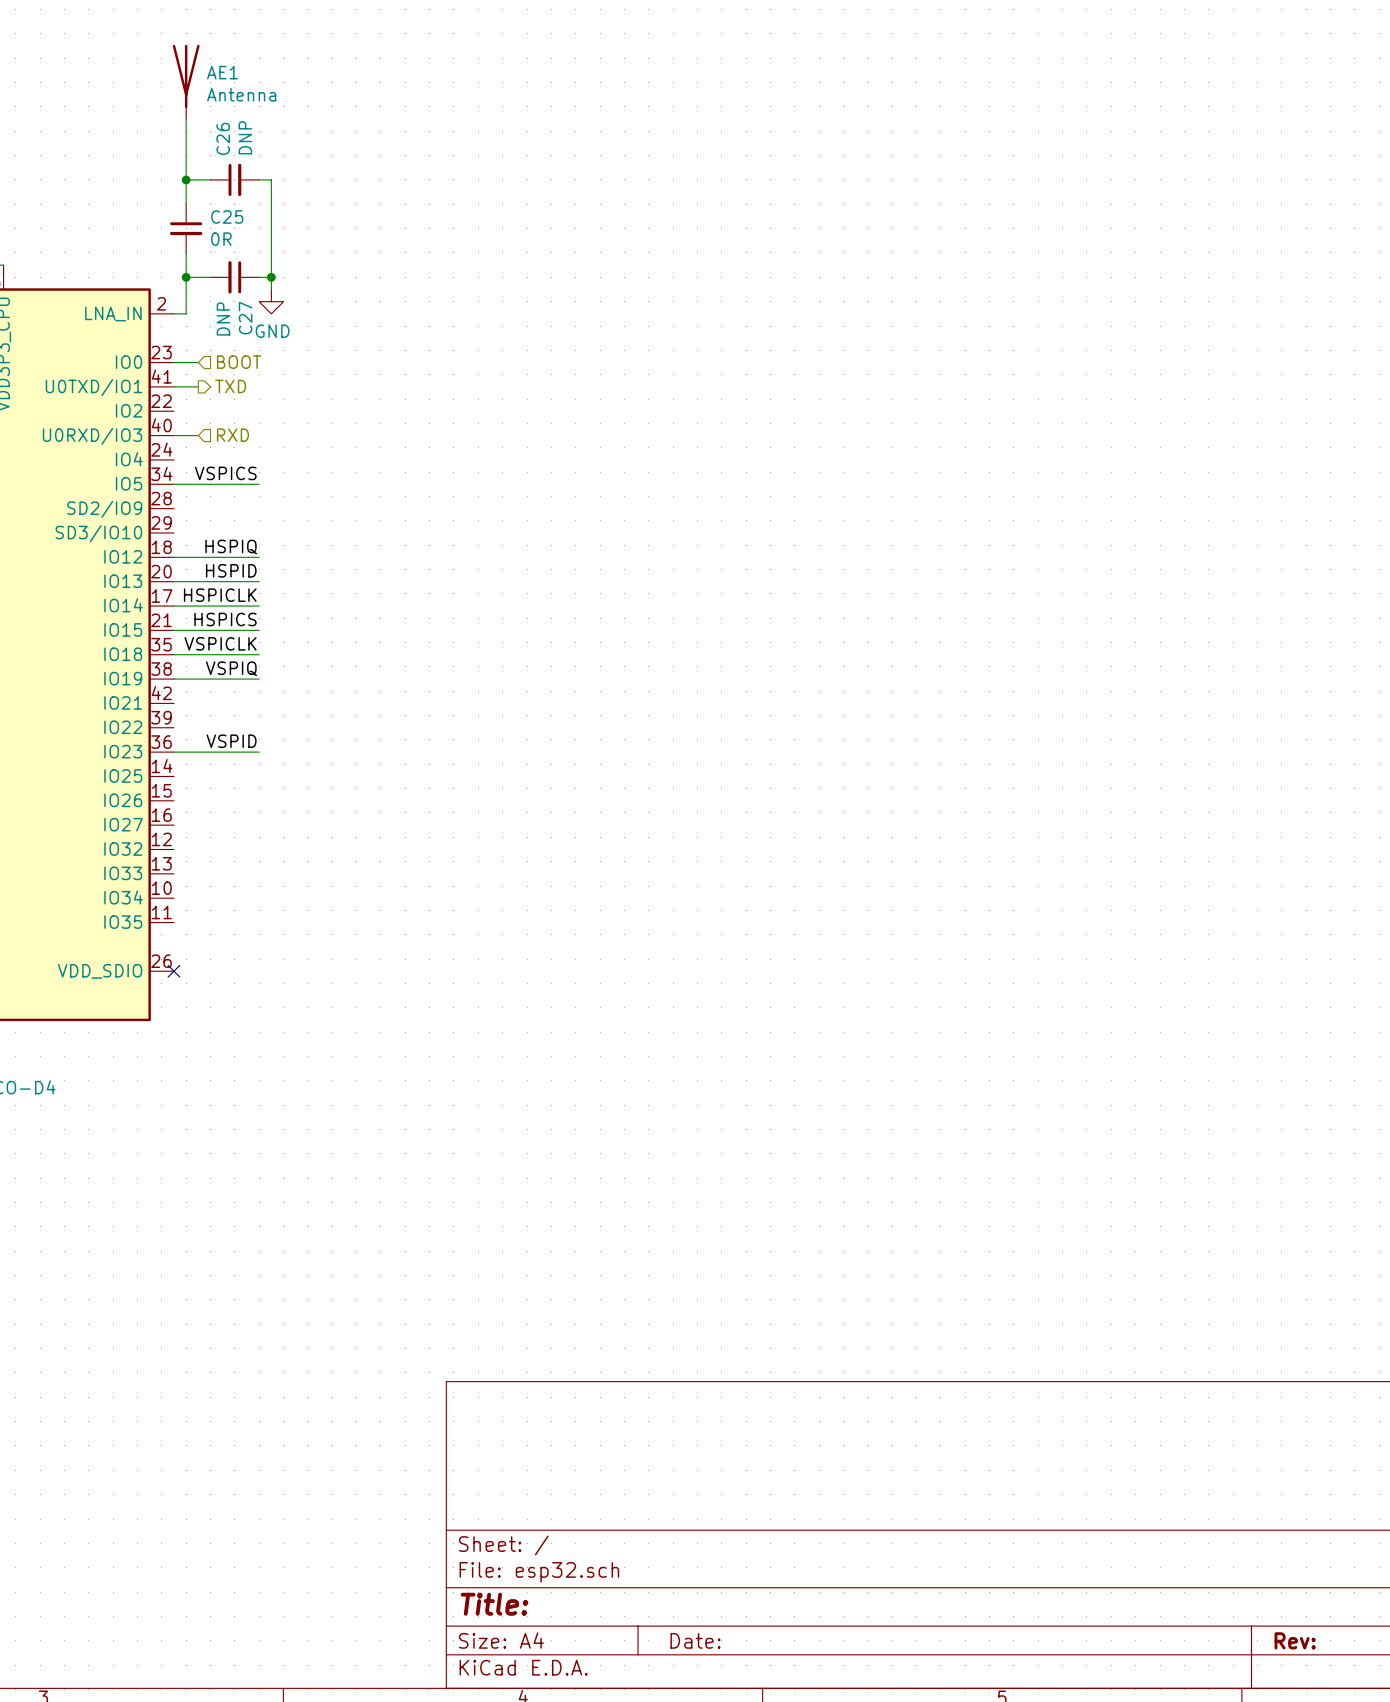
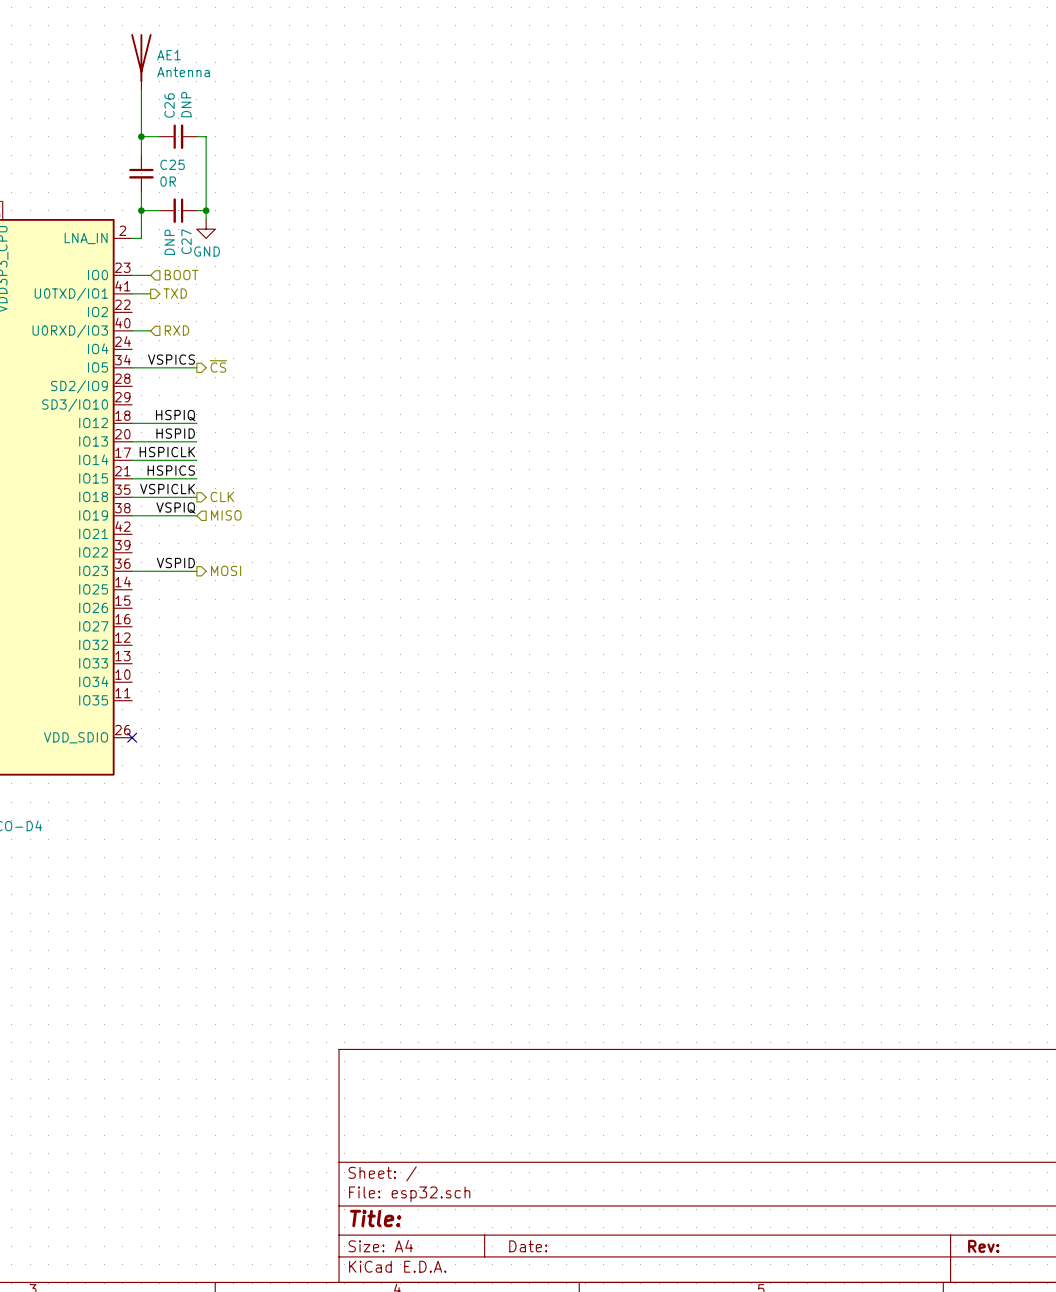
hierarchical label: none -> ~{CS} (218, 366)
hierarchical label: none -> CLK (222, 496)
hierarchical label: none -> MISO (226, 515)
hierarchical label: none -> MOSI (226, 570)

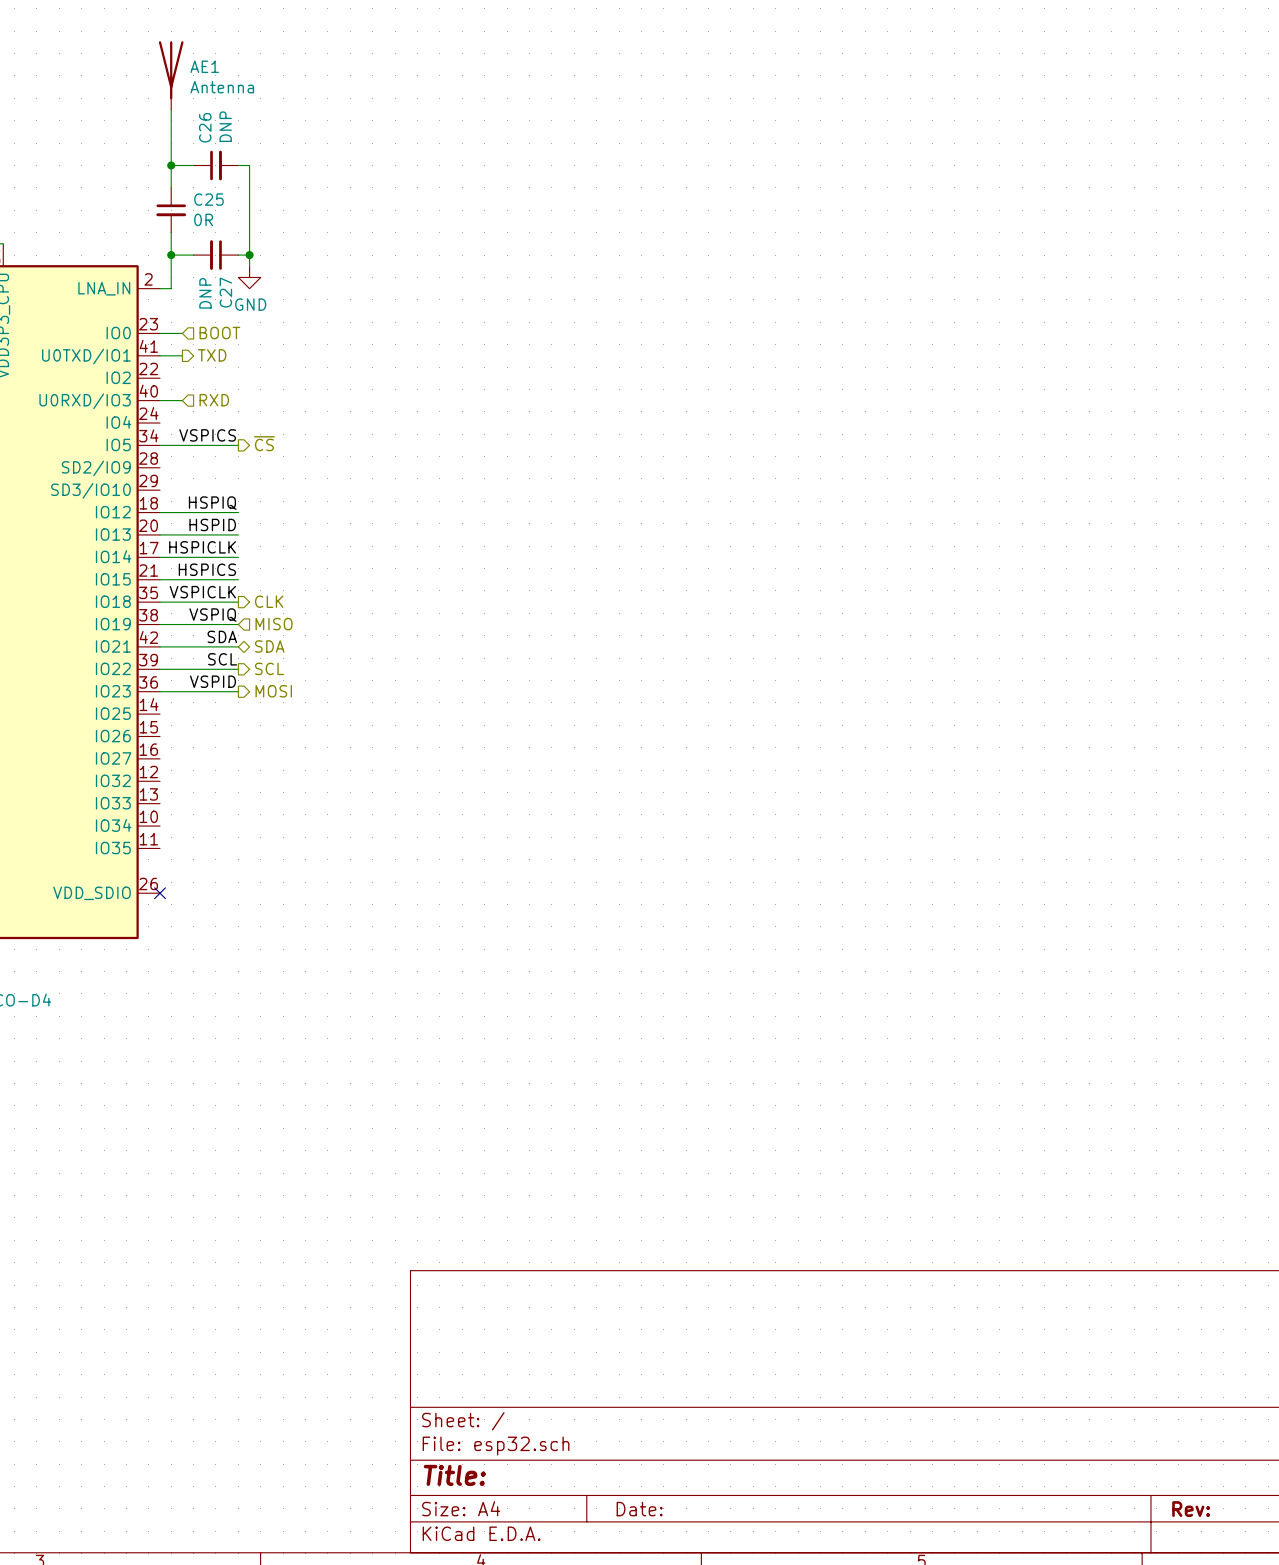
label: none -> SDA (222, 636)
hierarchical label: none -> SDA (269, 646)
wire: none -> (160, 646) (238, 646)
label: none -> SCL (222, 659)
wire: none -> (160, 669) (238, 669)
hierarchical label: none -> SCL (269, 668)

